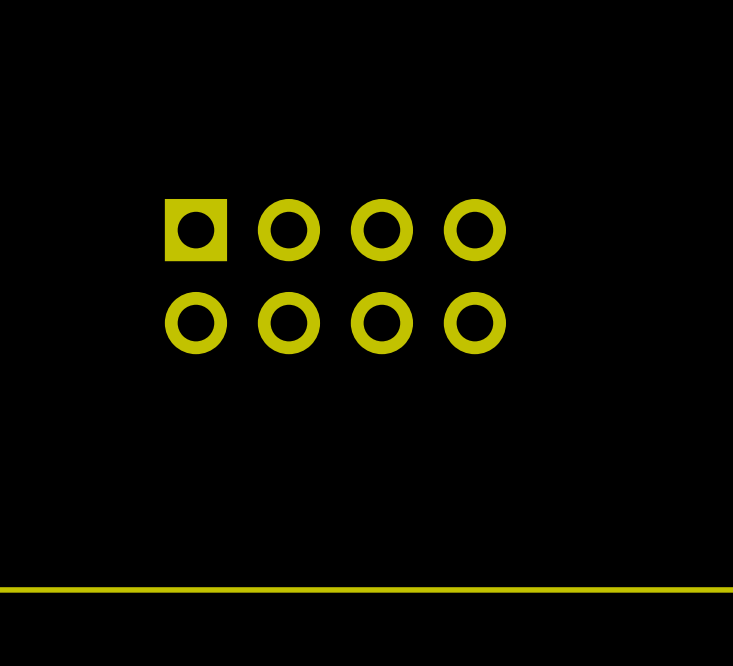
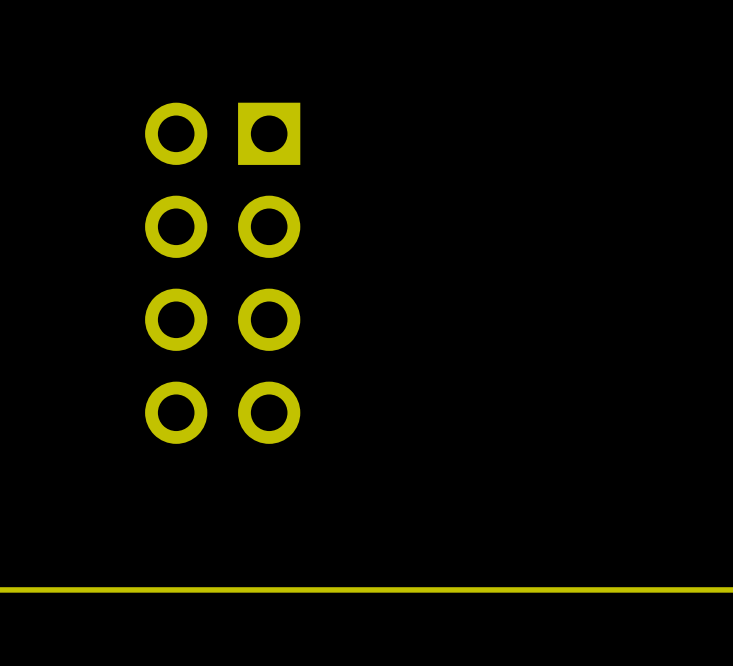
part rotation: 0° (335, 276) -> 90° clockwise (222, 273)

